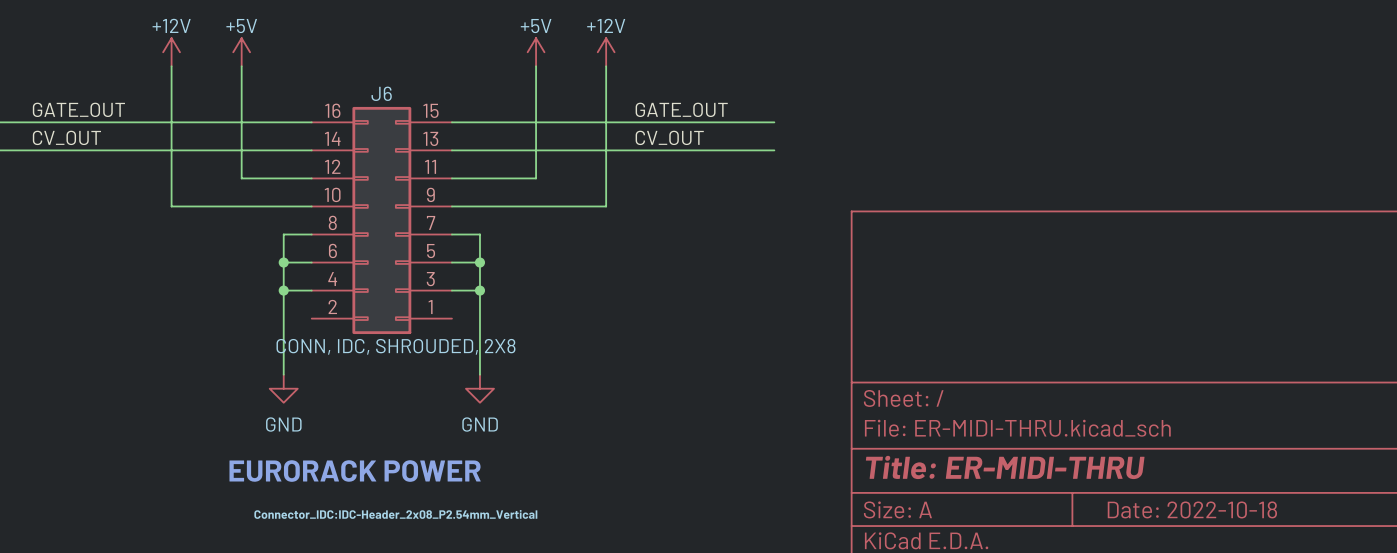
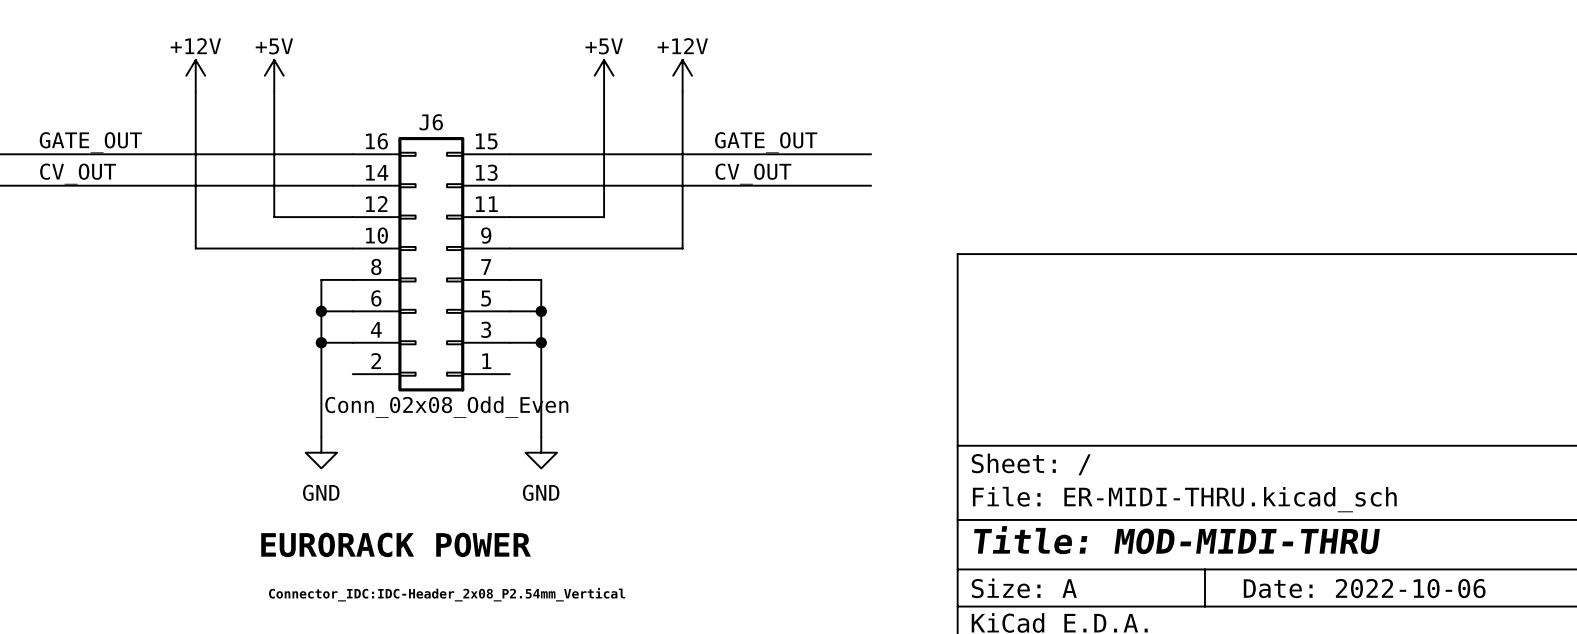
J6 value: CONN, IDC, SHROUDED, 2X8 (395, 346) -> Conn_02x08_Odd_Even (446, 407)
title block: Title: ER-MIDI-THRU (1005, 467) -> Title: MOD-MIDI-THRU (1176, 540)
title block: Date: 2022-10-18 (1192, 509) -> Date: 2022-10-06 (1364, 588)

